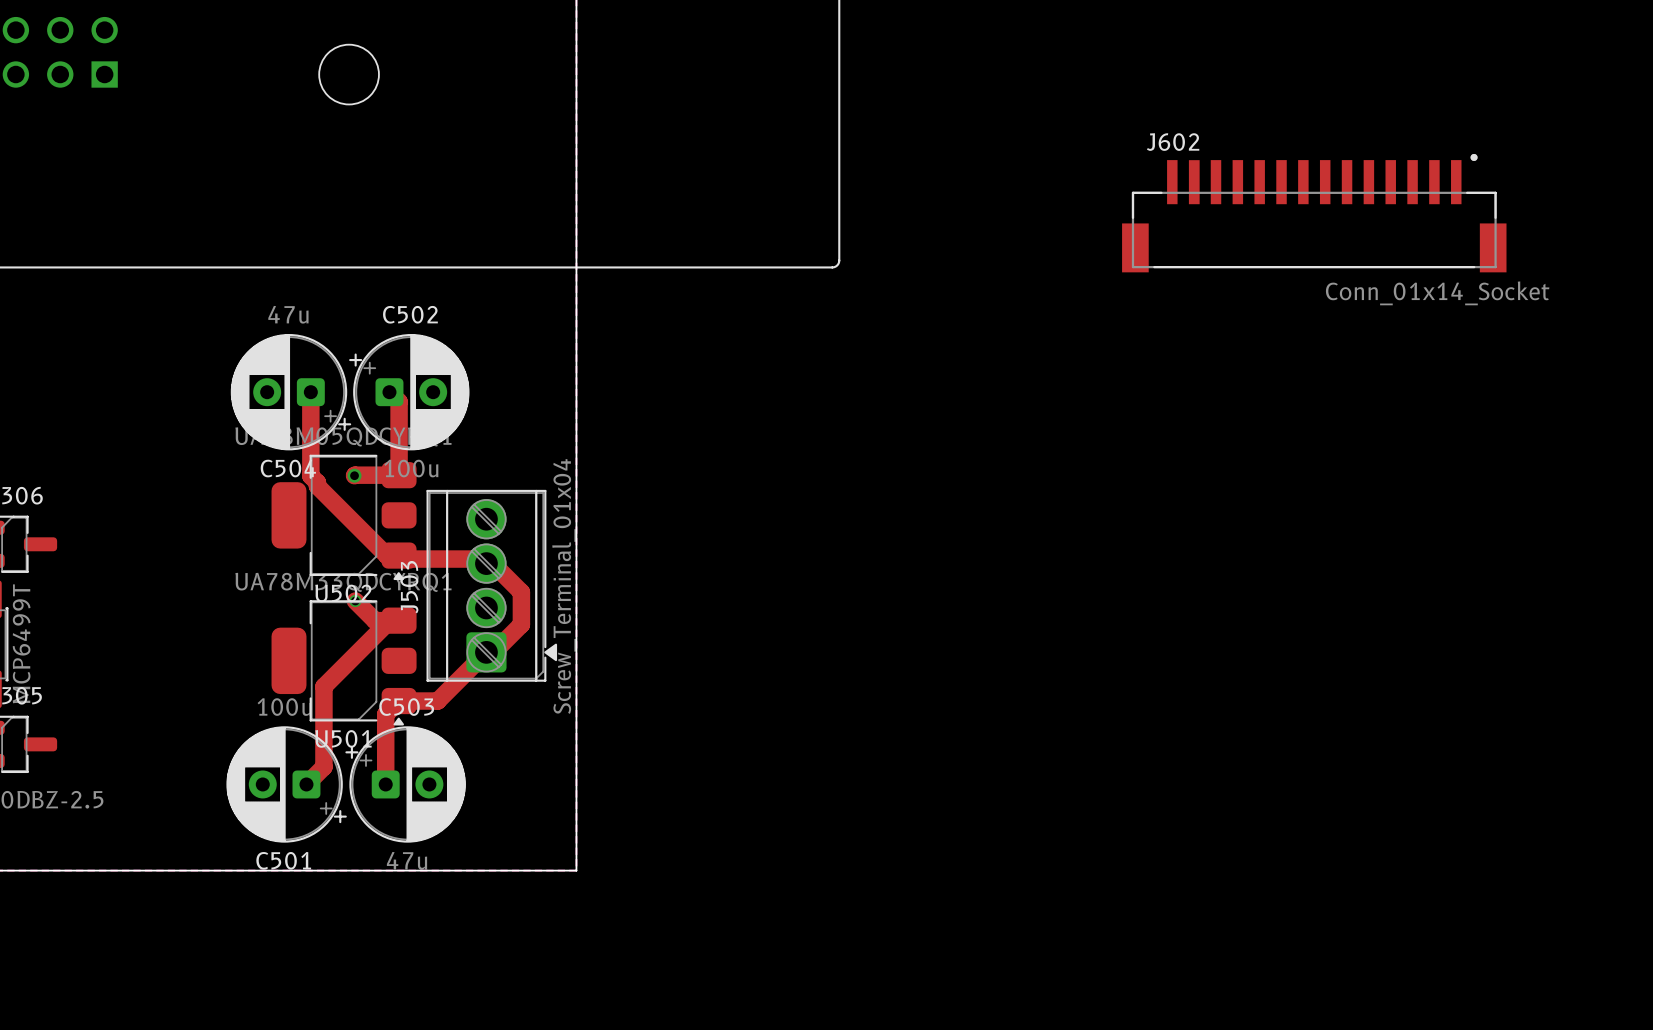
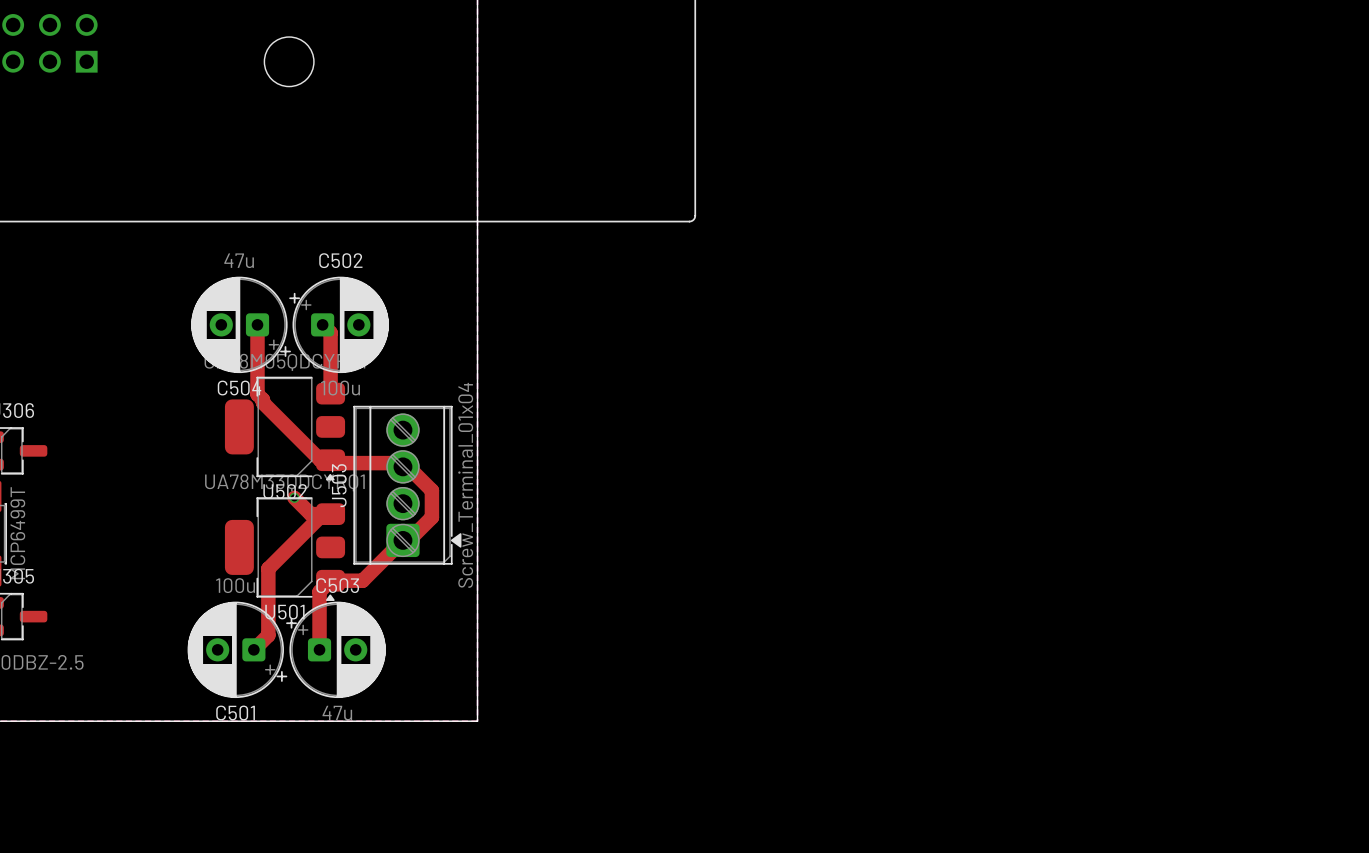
J602: Conn_01x14_Socket (1314, 213) -> none
via: (354, 475) -> none
top track: (399, 475) (354, 475) -> none

